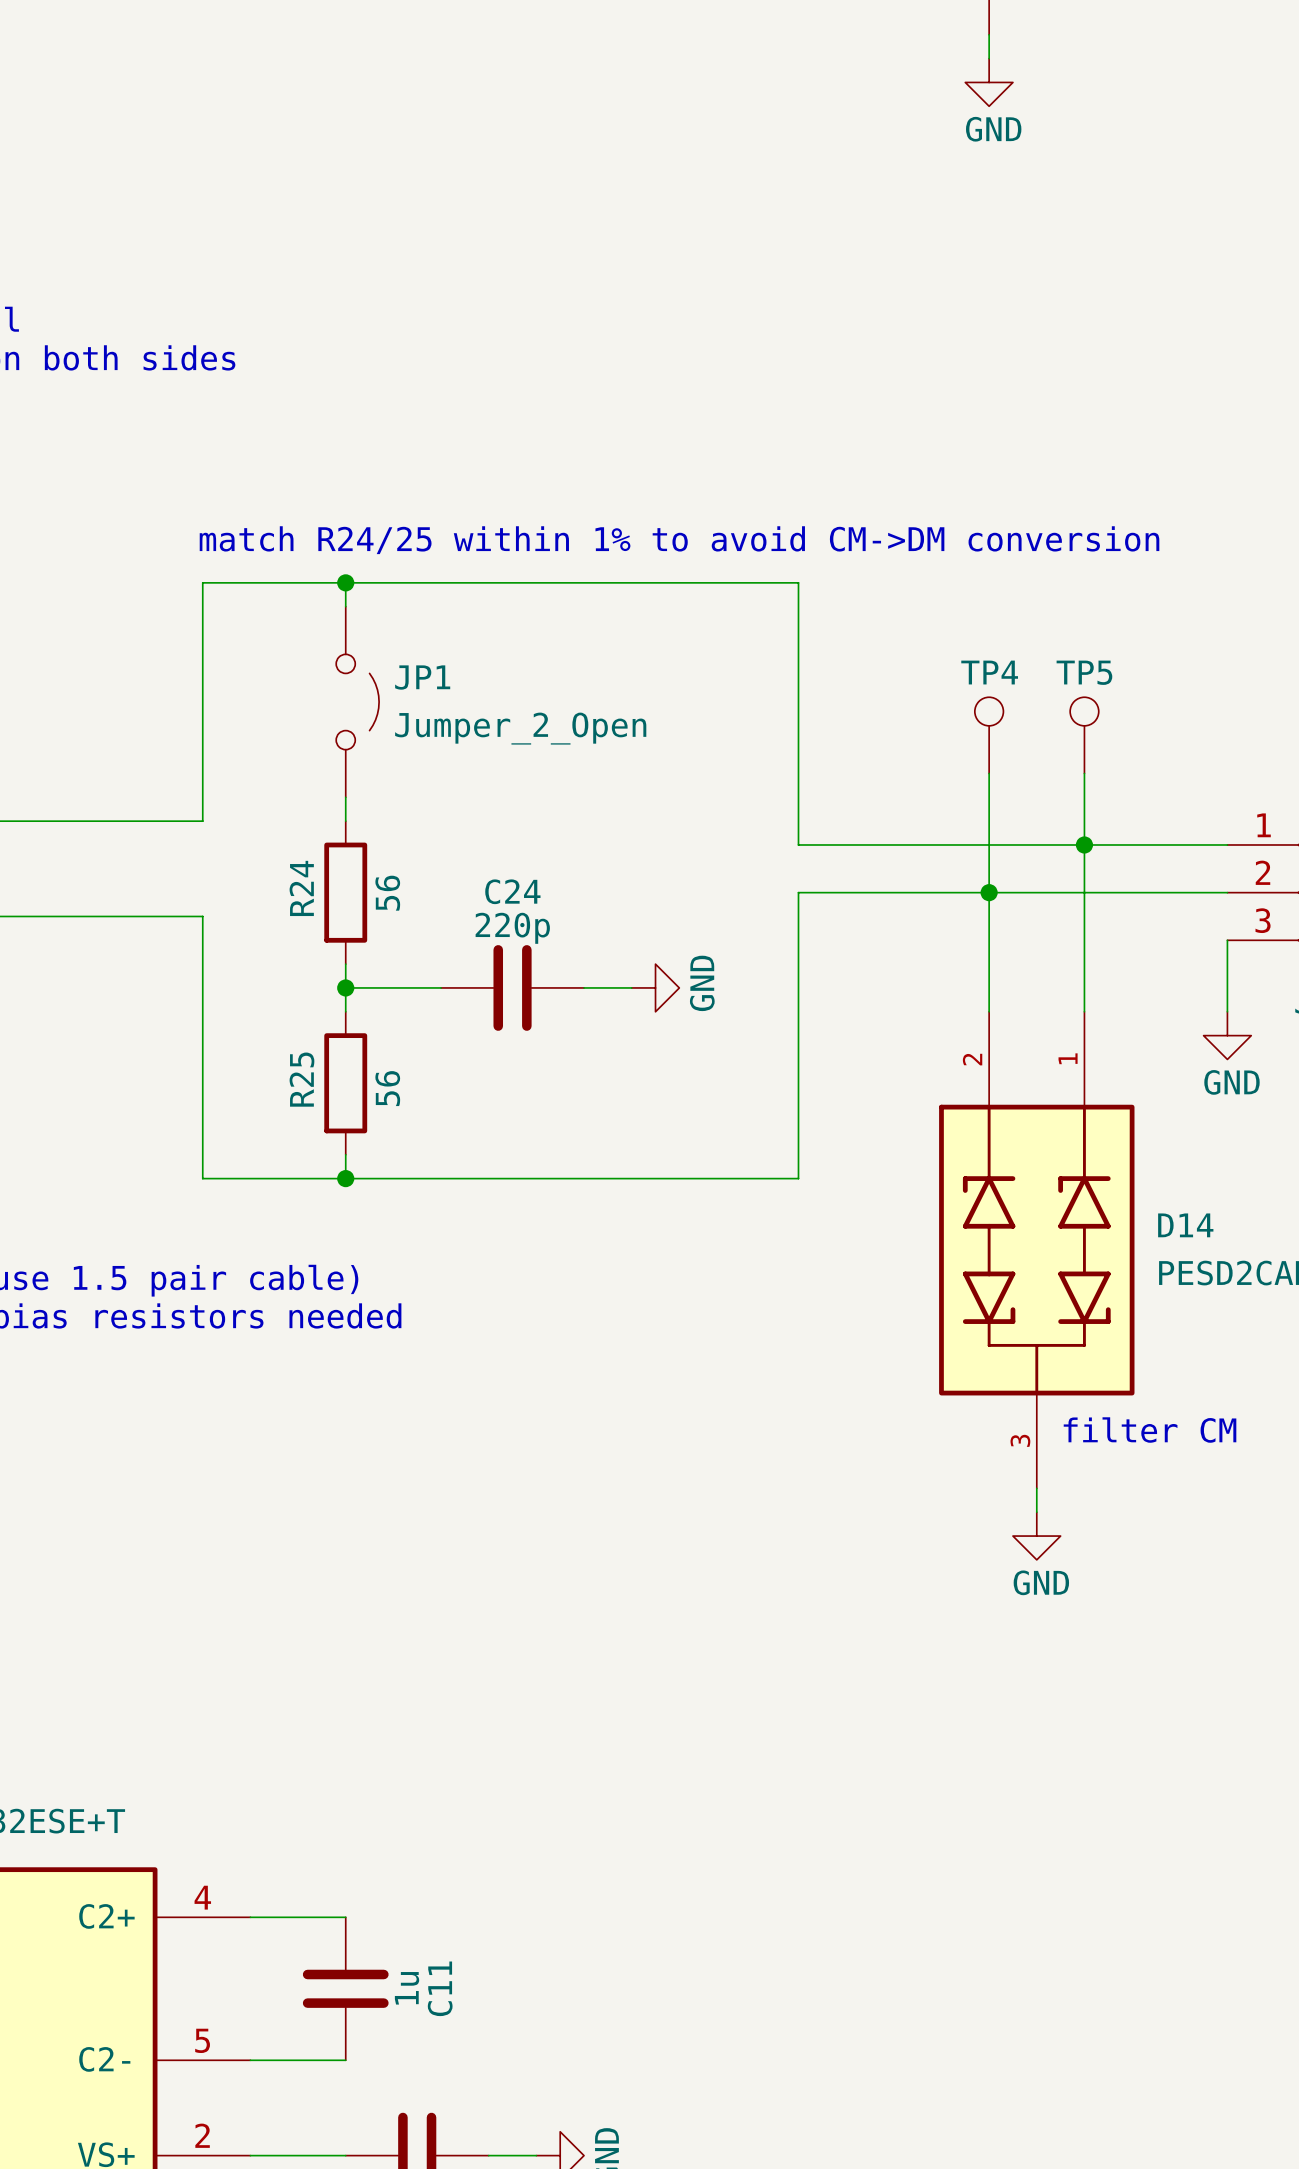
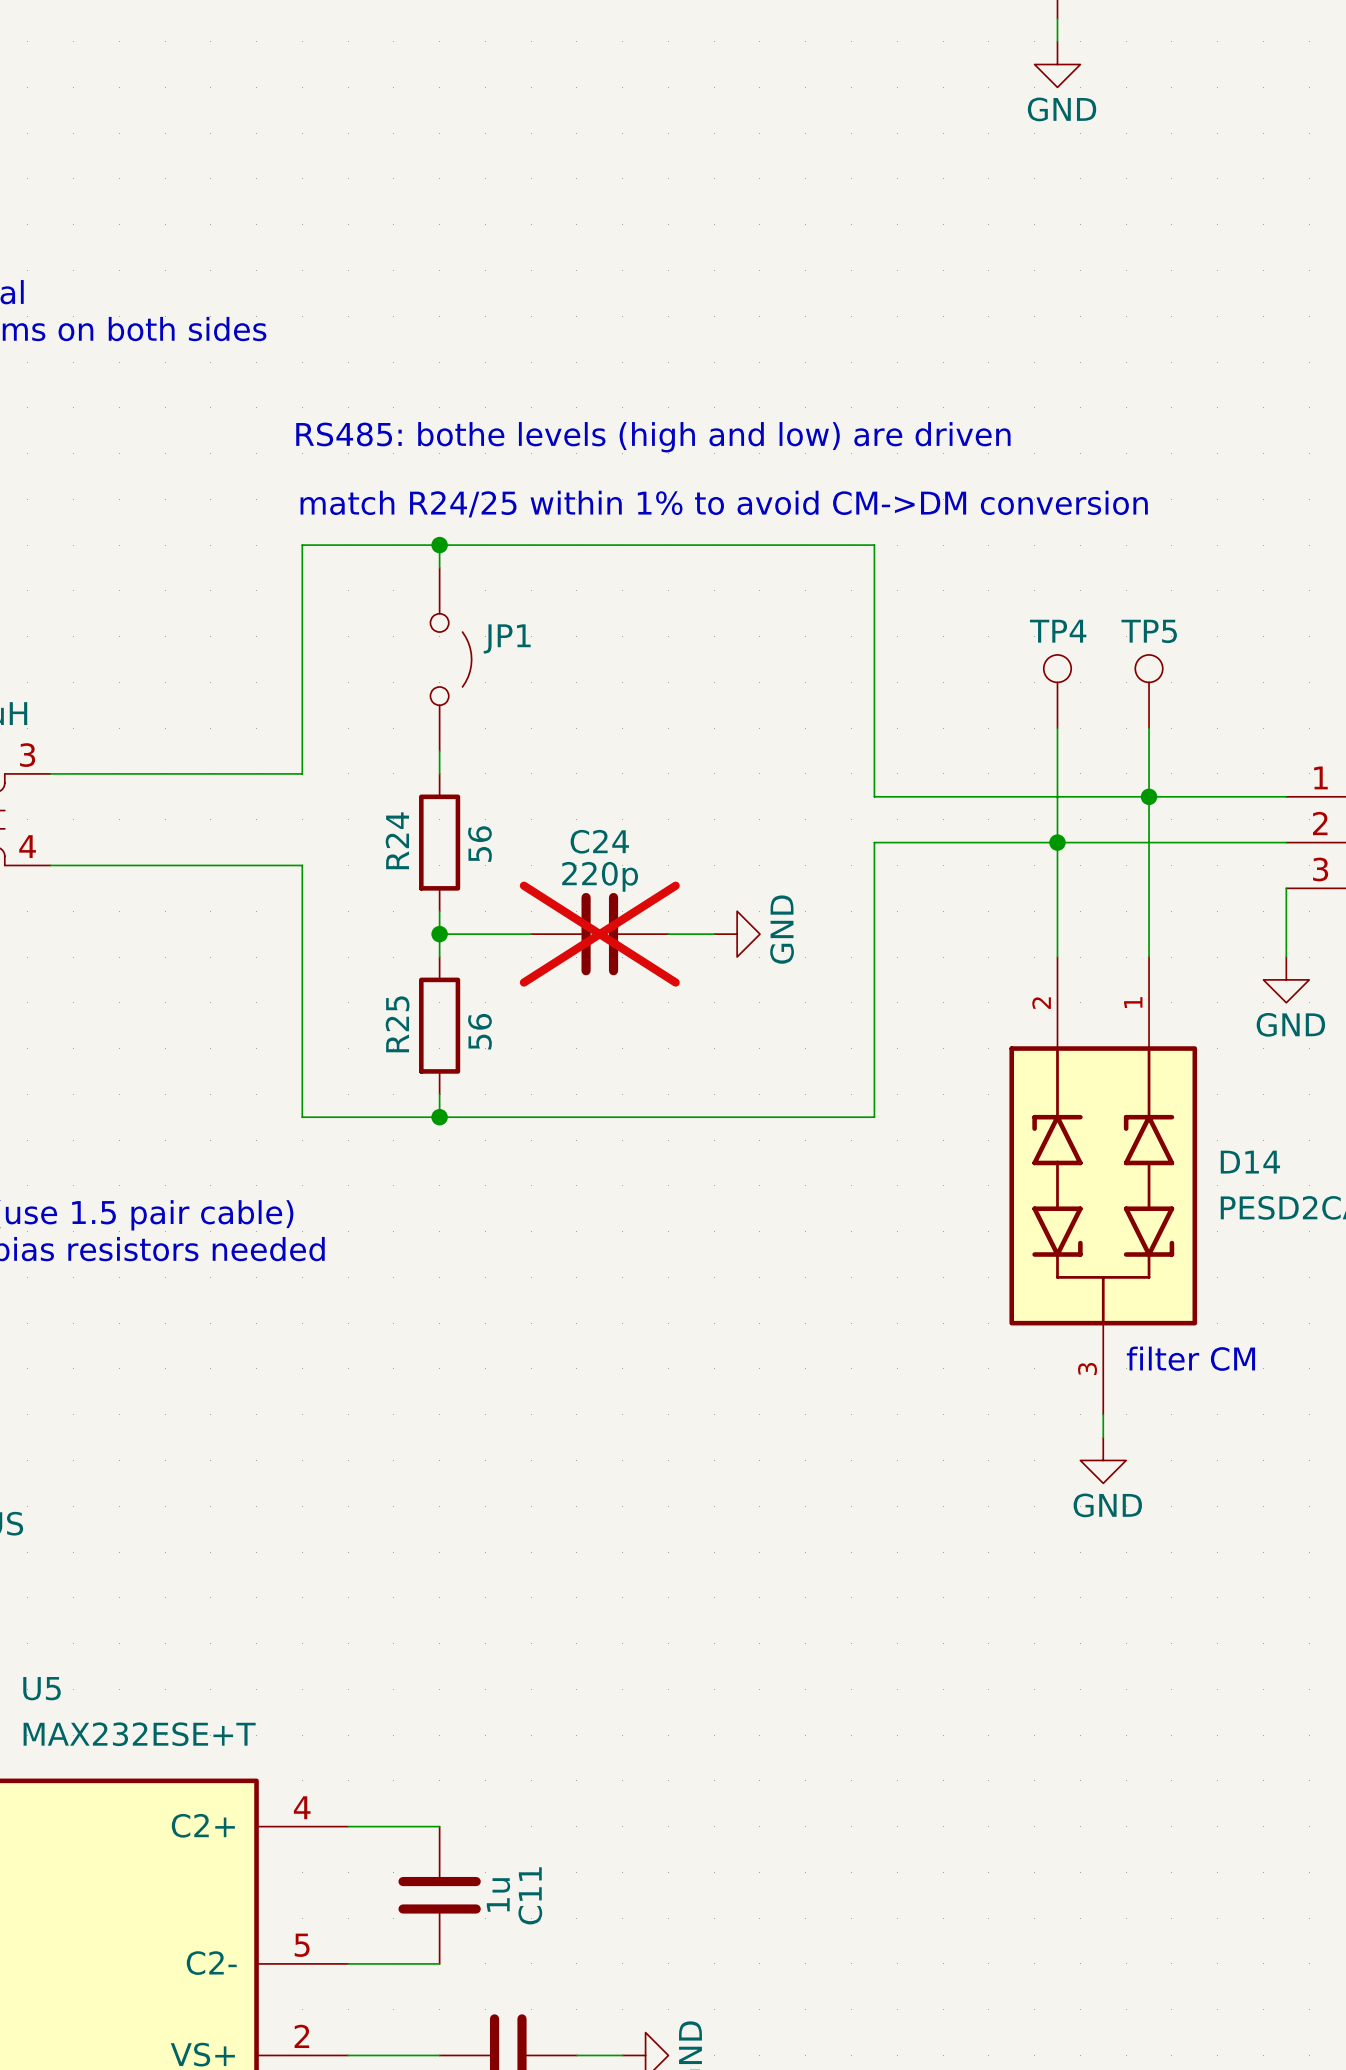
text: none -> RS485: bothe levels (high and low) are driven (653, 437)
JP1 value: Jumper_2_Open (520, 728) -> none
C24 do-not-place cross: none -> (599, 934)

